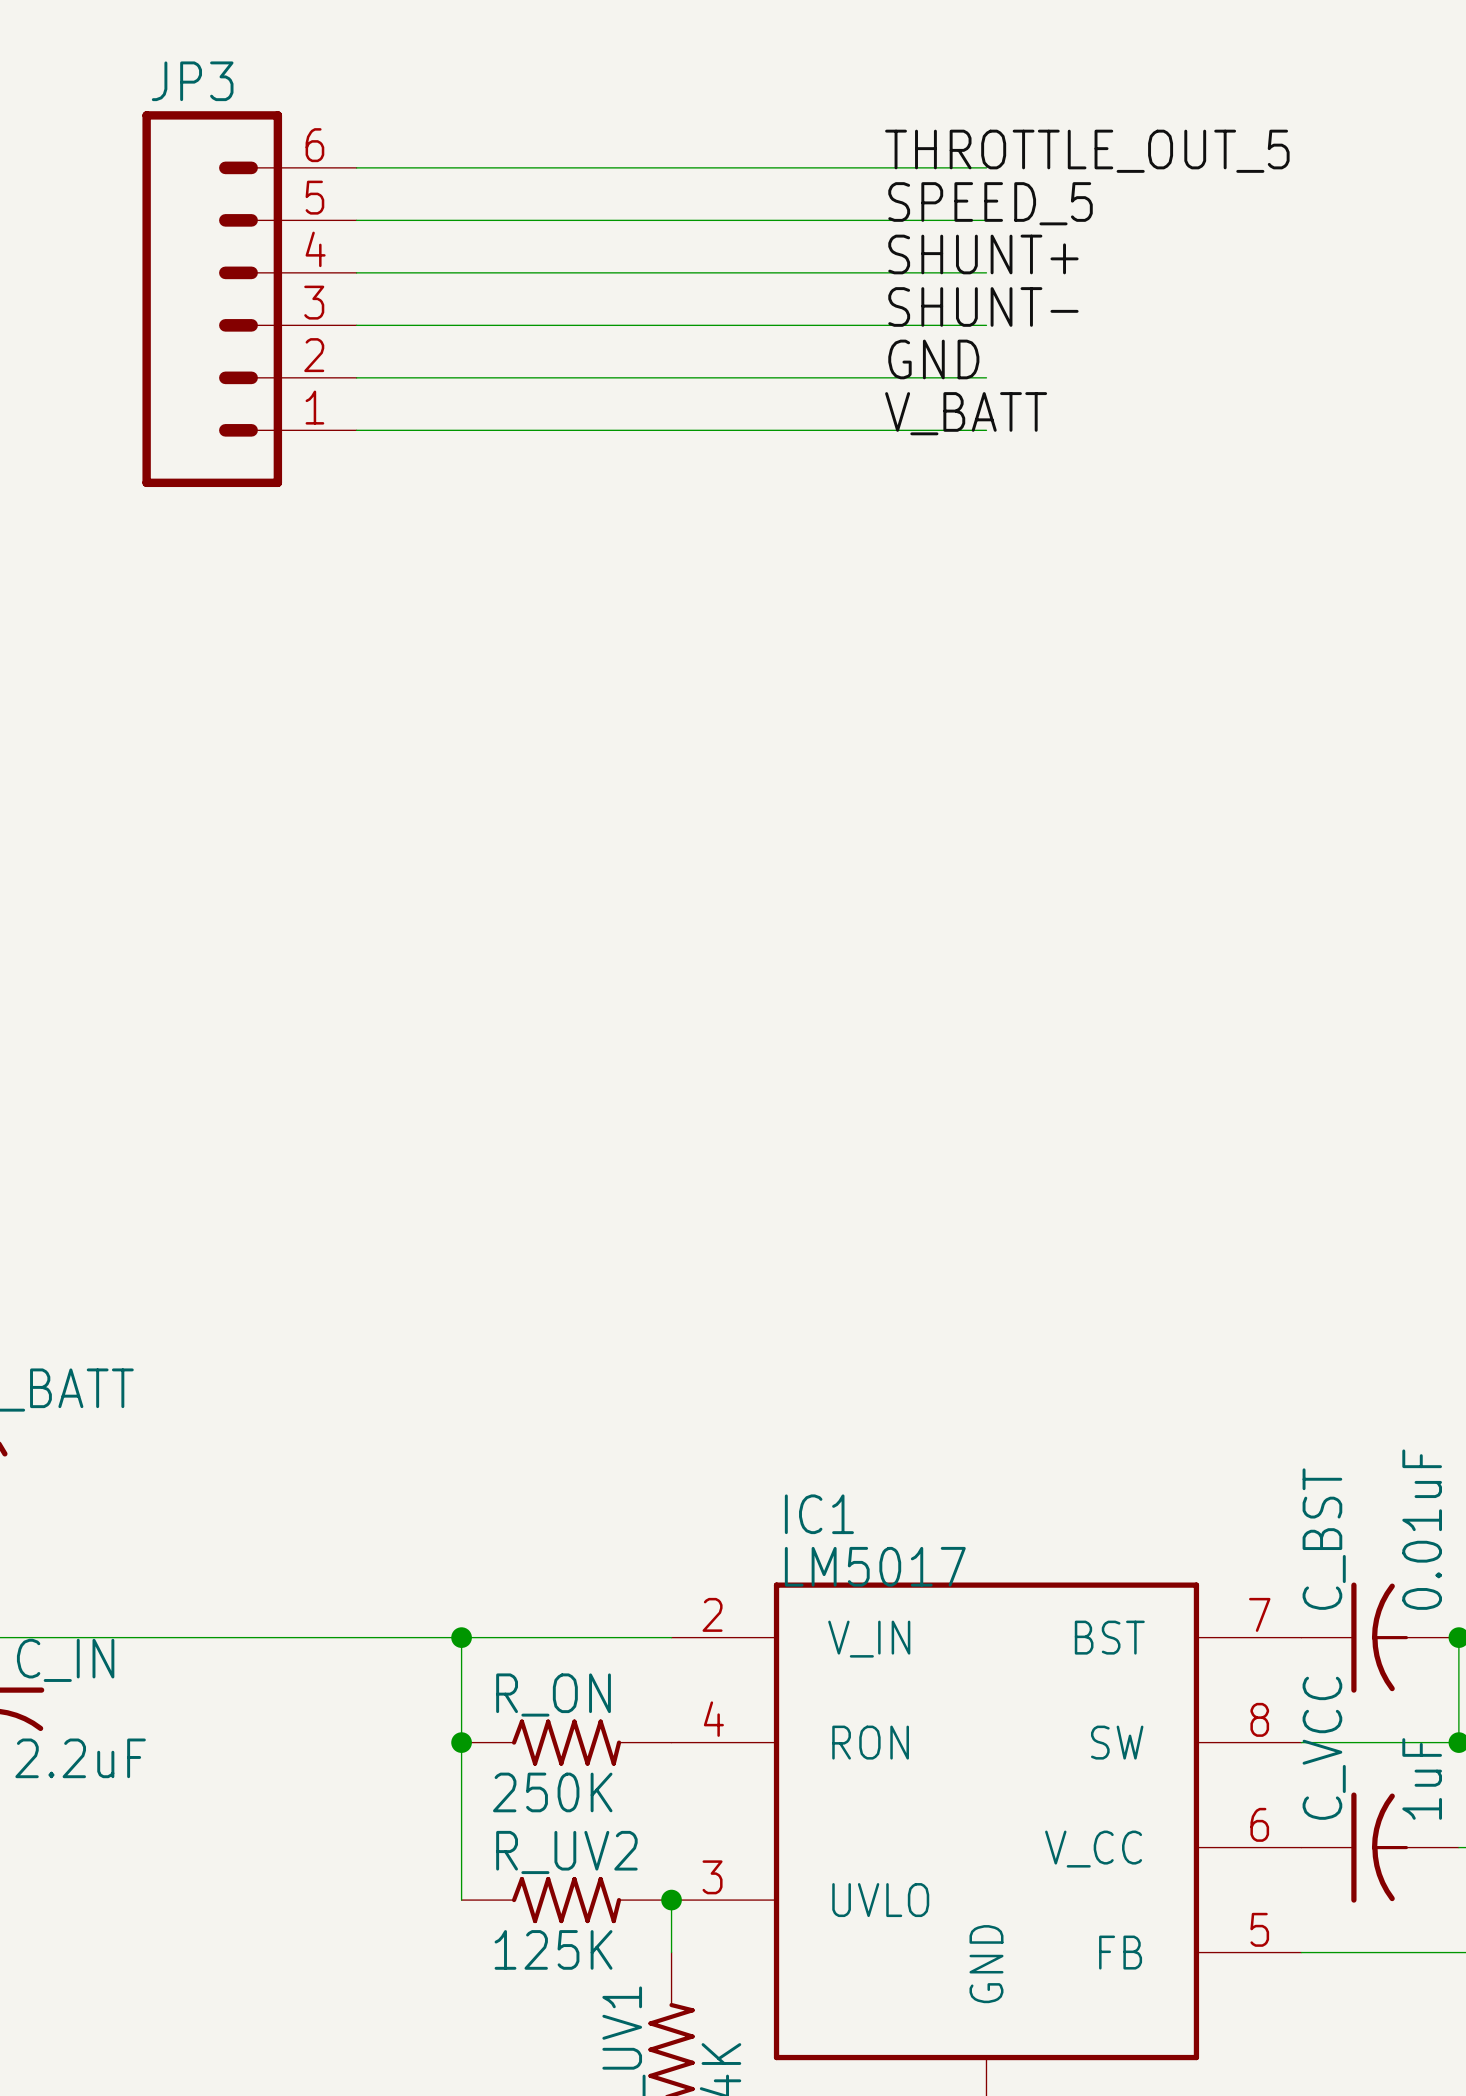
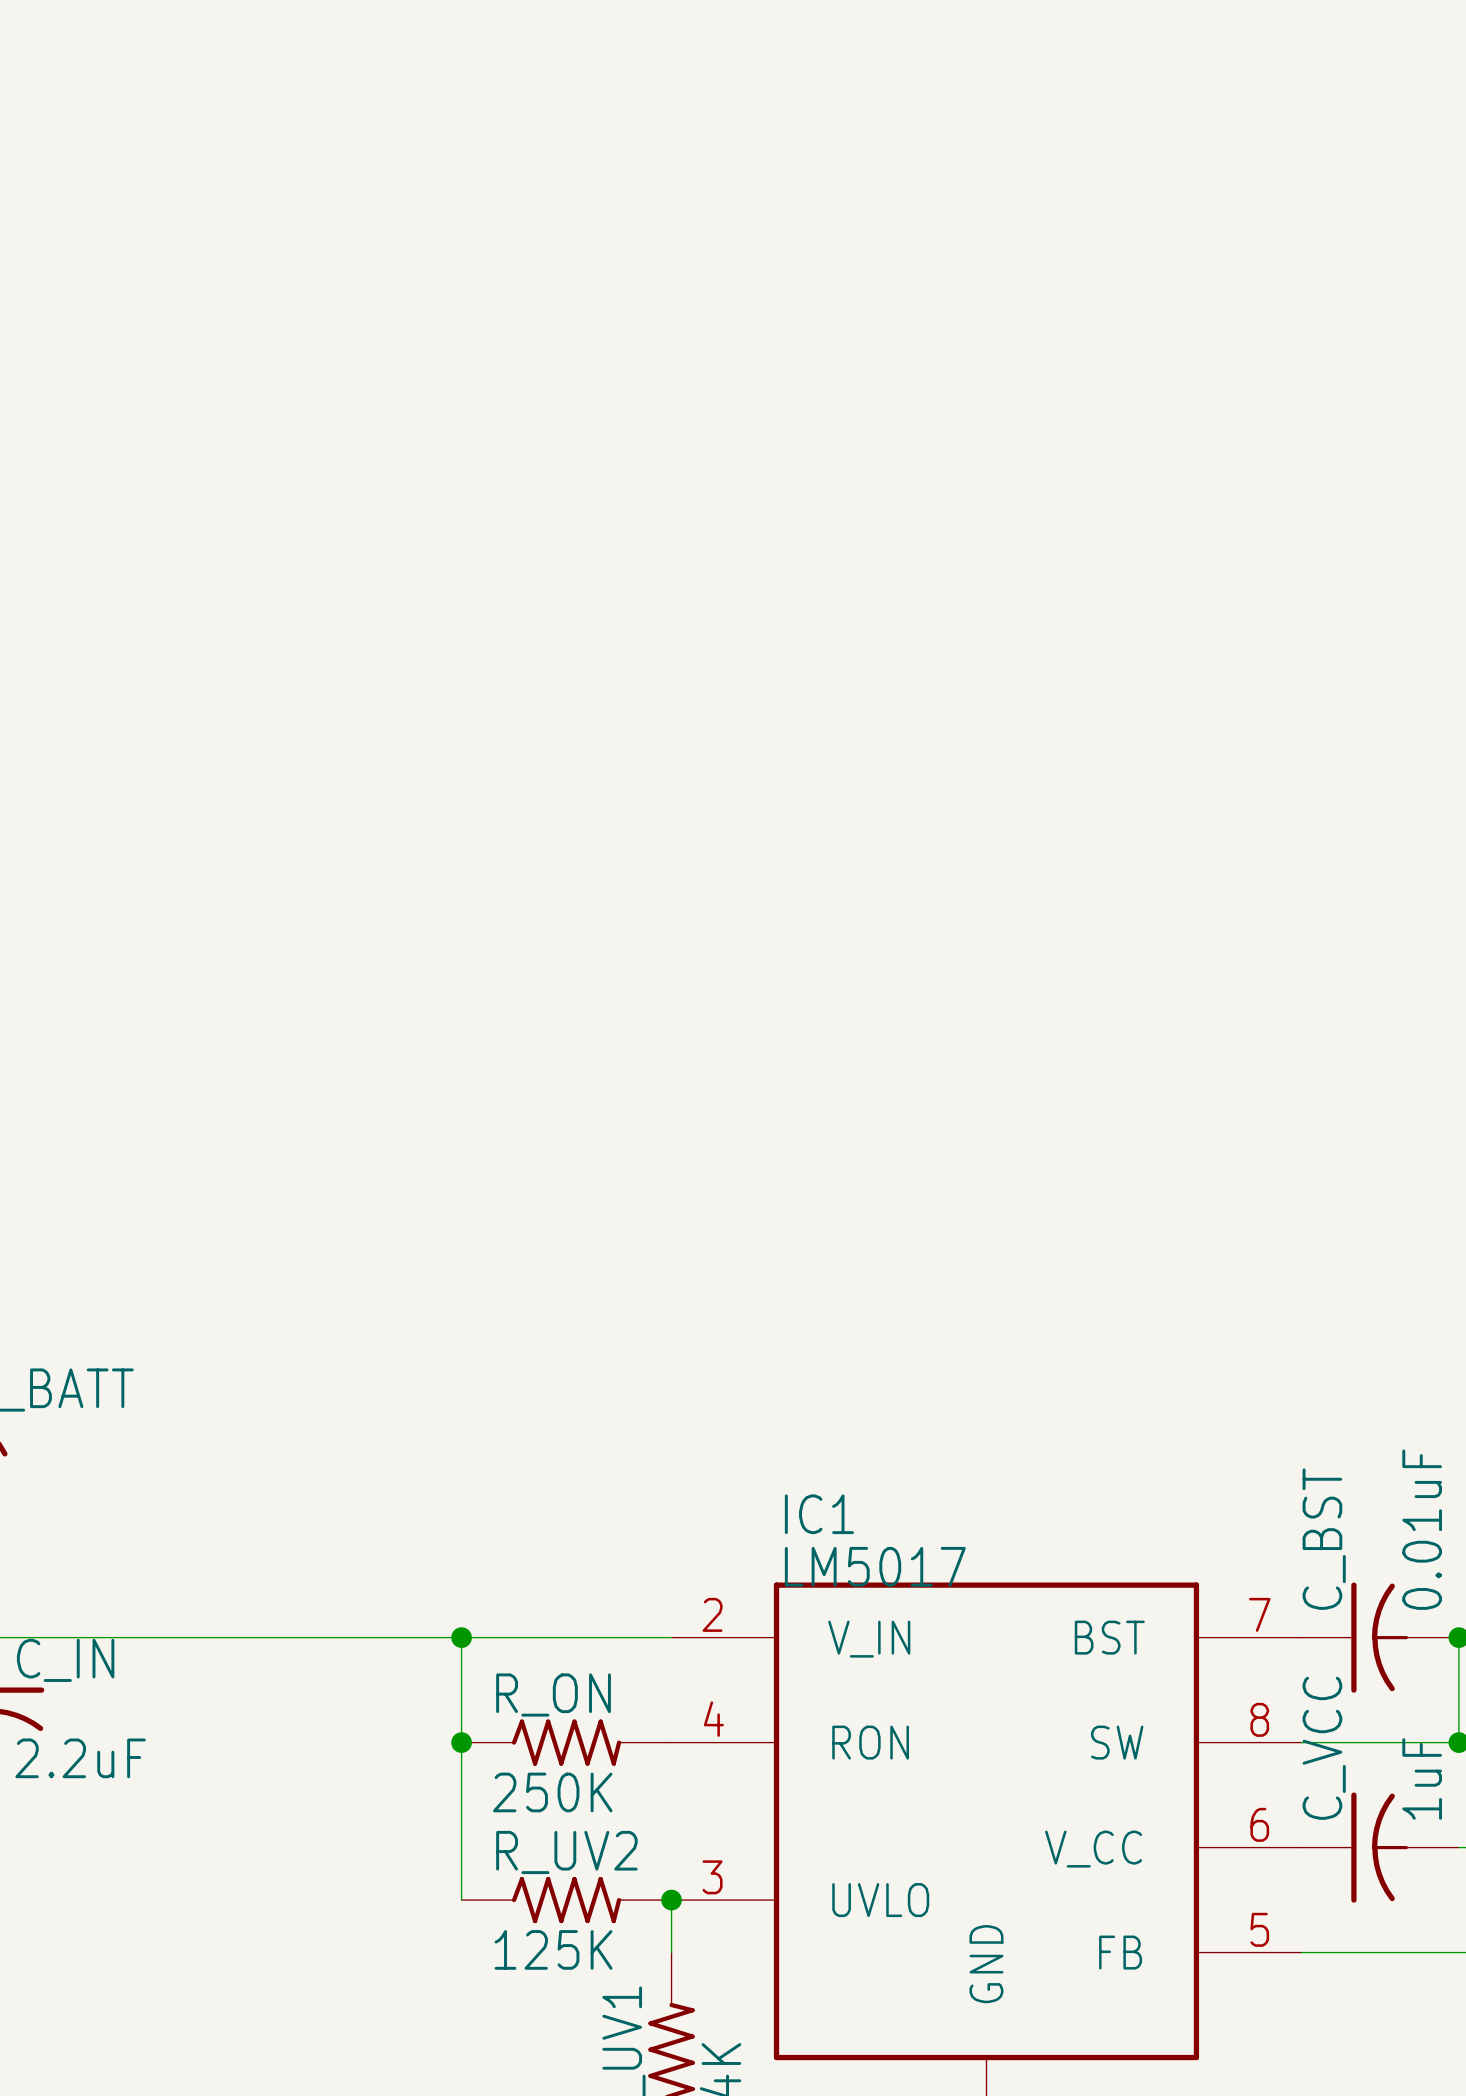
label: THROTTLE_OUT_5 (1087, 151) -> none
wire: (356, 167) (986, 167) -> none
label: SPEED_5 (990, 203) -> none
wire: (356, 220) (986, 220) -> none
label: SHUNT+ (983, 254) -> none
wire: (356, 272) (986, 272) -> none
JP3: (249, 299) -> none
label: SHUNT- (983, 306) -> none
wire: (356, 325) (986, 325) -> none
label: GND (933, 359) -> none
wire: (356, 377) (986, 377) -> none
label: V_BATT (966, 413) -> none
wire: (356, 430) (986, 430) -> none

